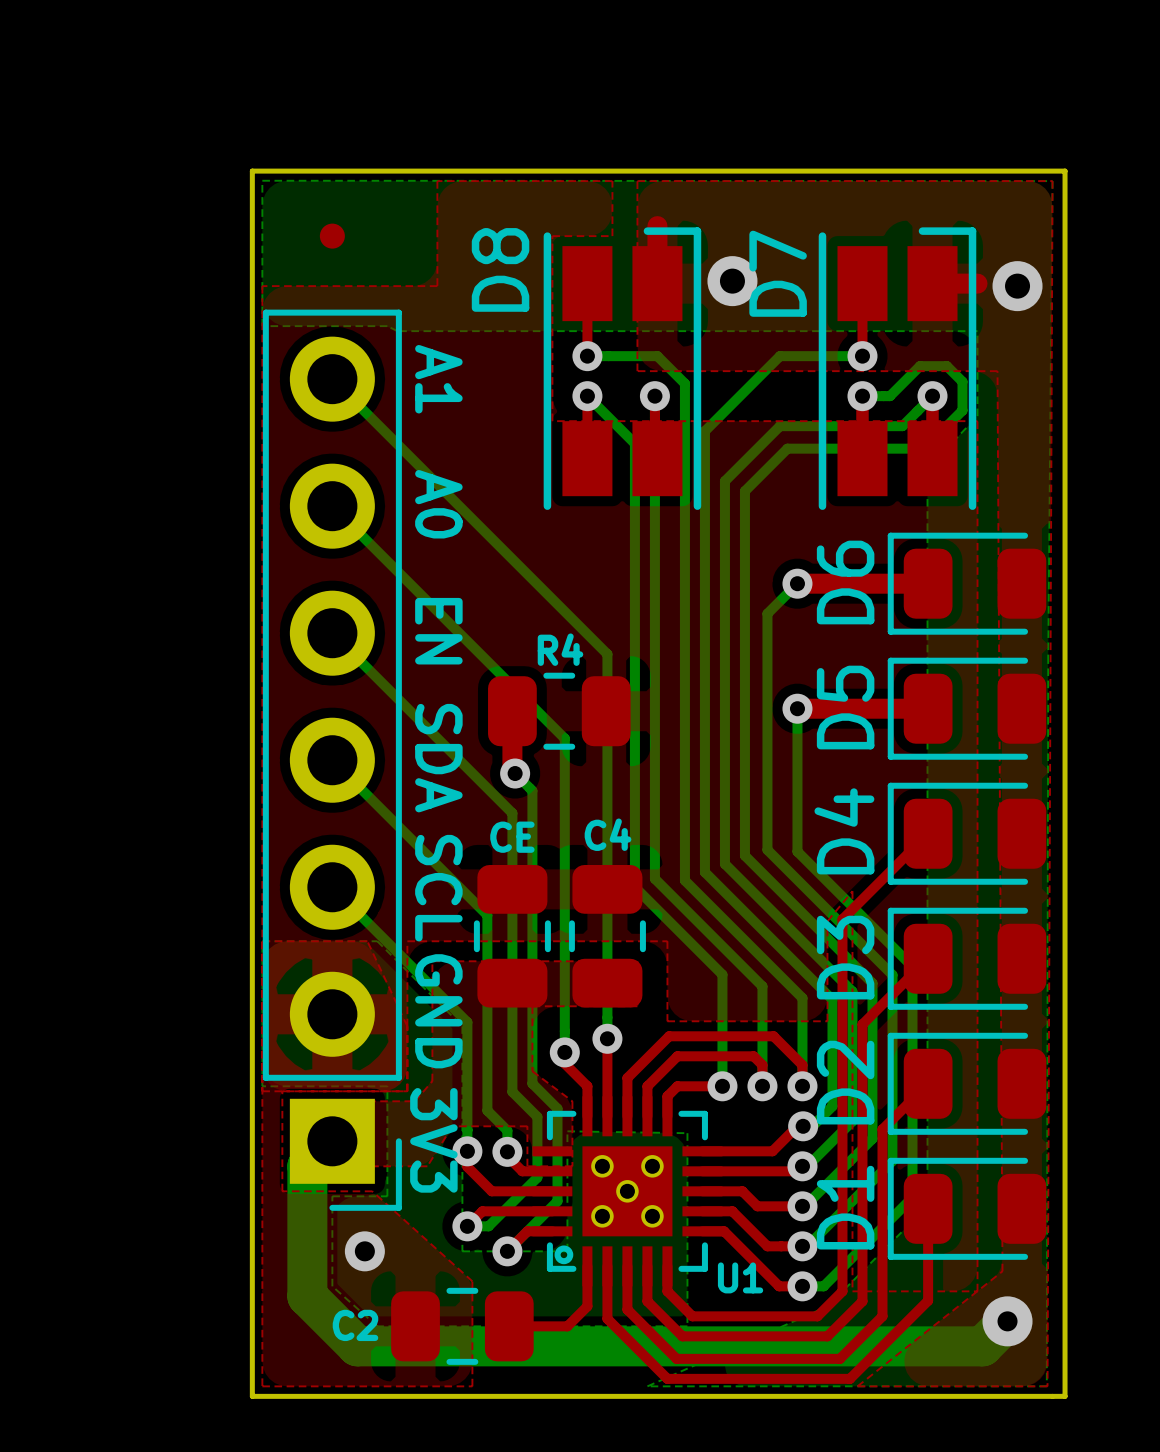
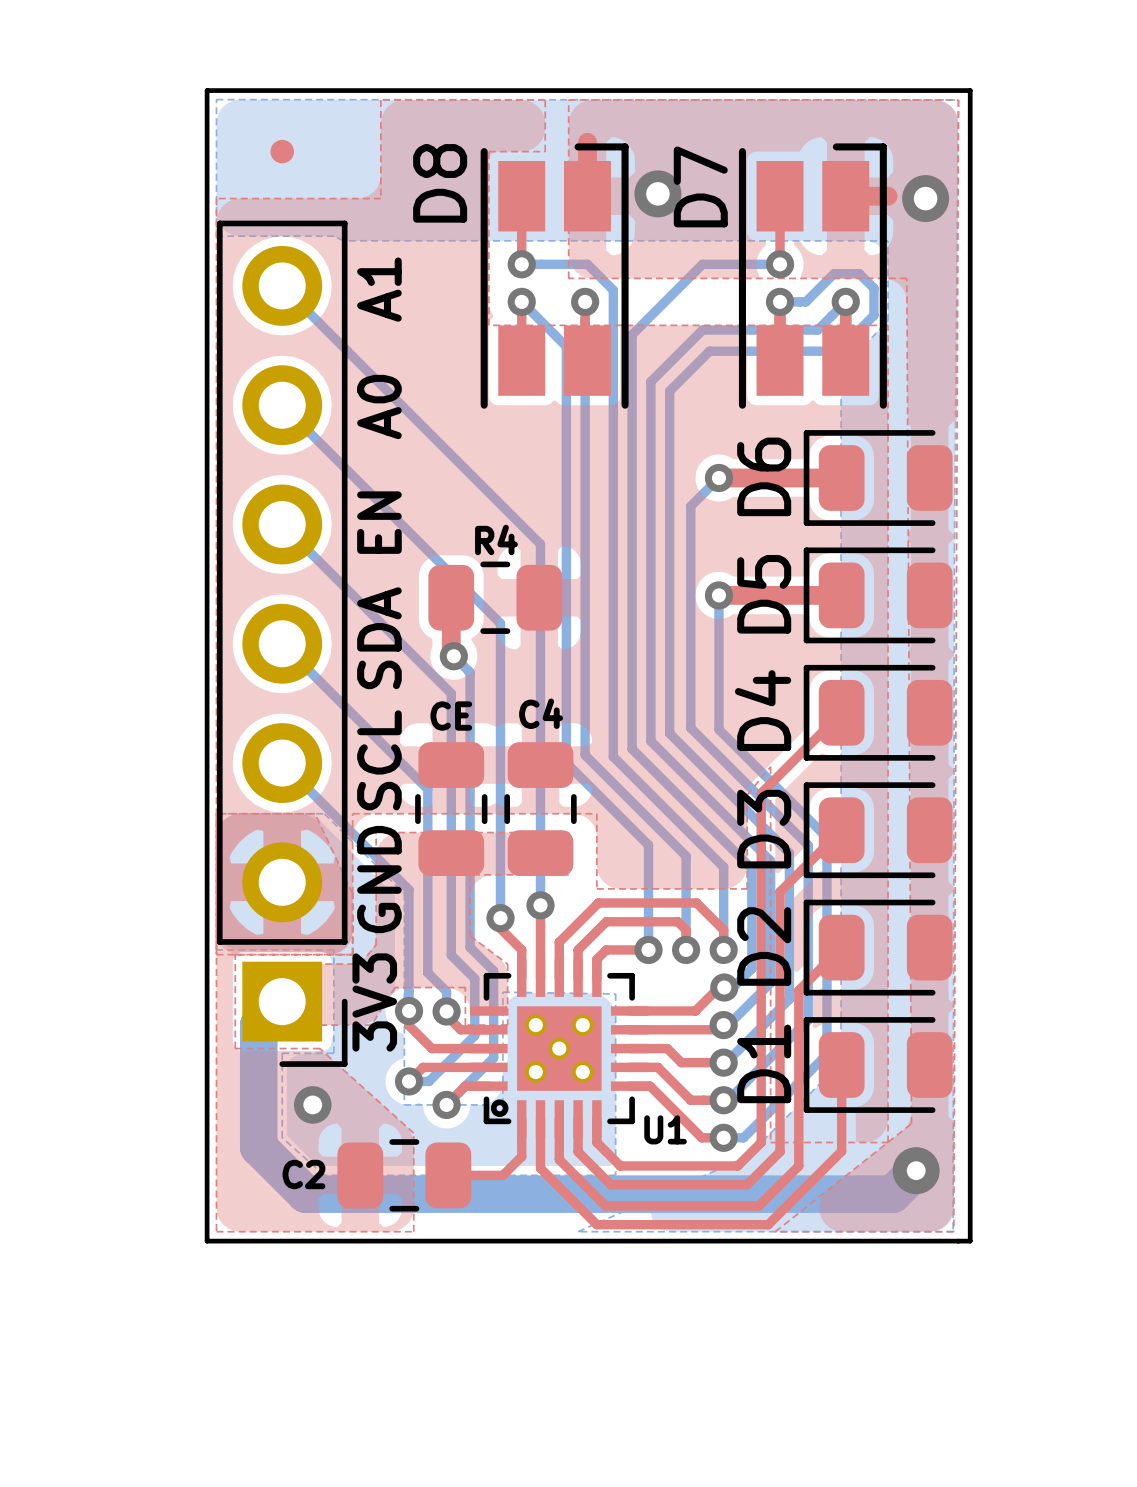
text rotation: 0° (438, 379) -> 180° (379, 289)
text rotation: 0° (438, 504) -> 180° (379, 406)
text rotation: 0° (438, 631) -> 180° (379, 522)
text rotation: 0° (438, 758) -> 180° (379, 638)
text rotation: 0° (438, 888) -> 180° (379, 760)
text rotation: 0° (438, 1011) -> 180° (379, 879)
text rotation: 0° (433, 1140) -> 180° (374, 1002)

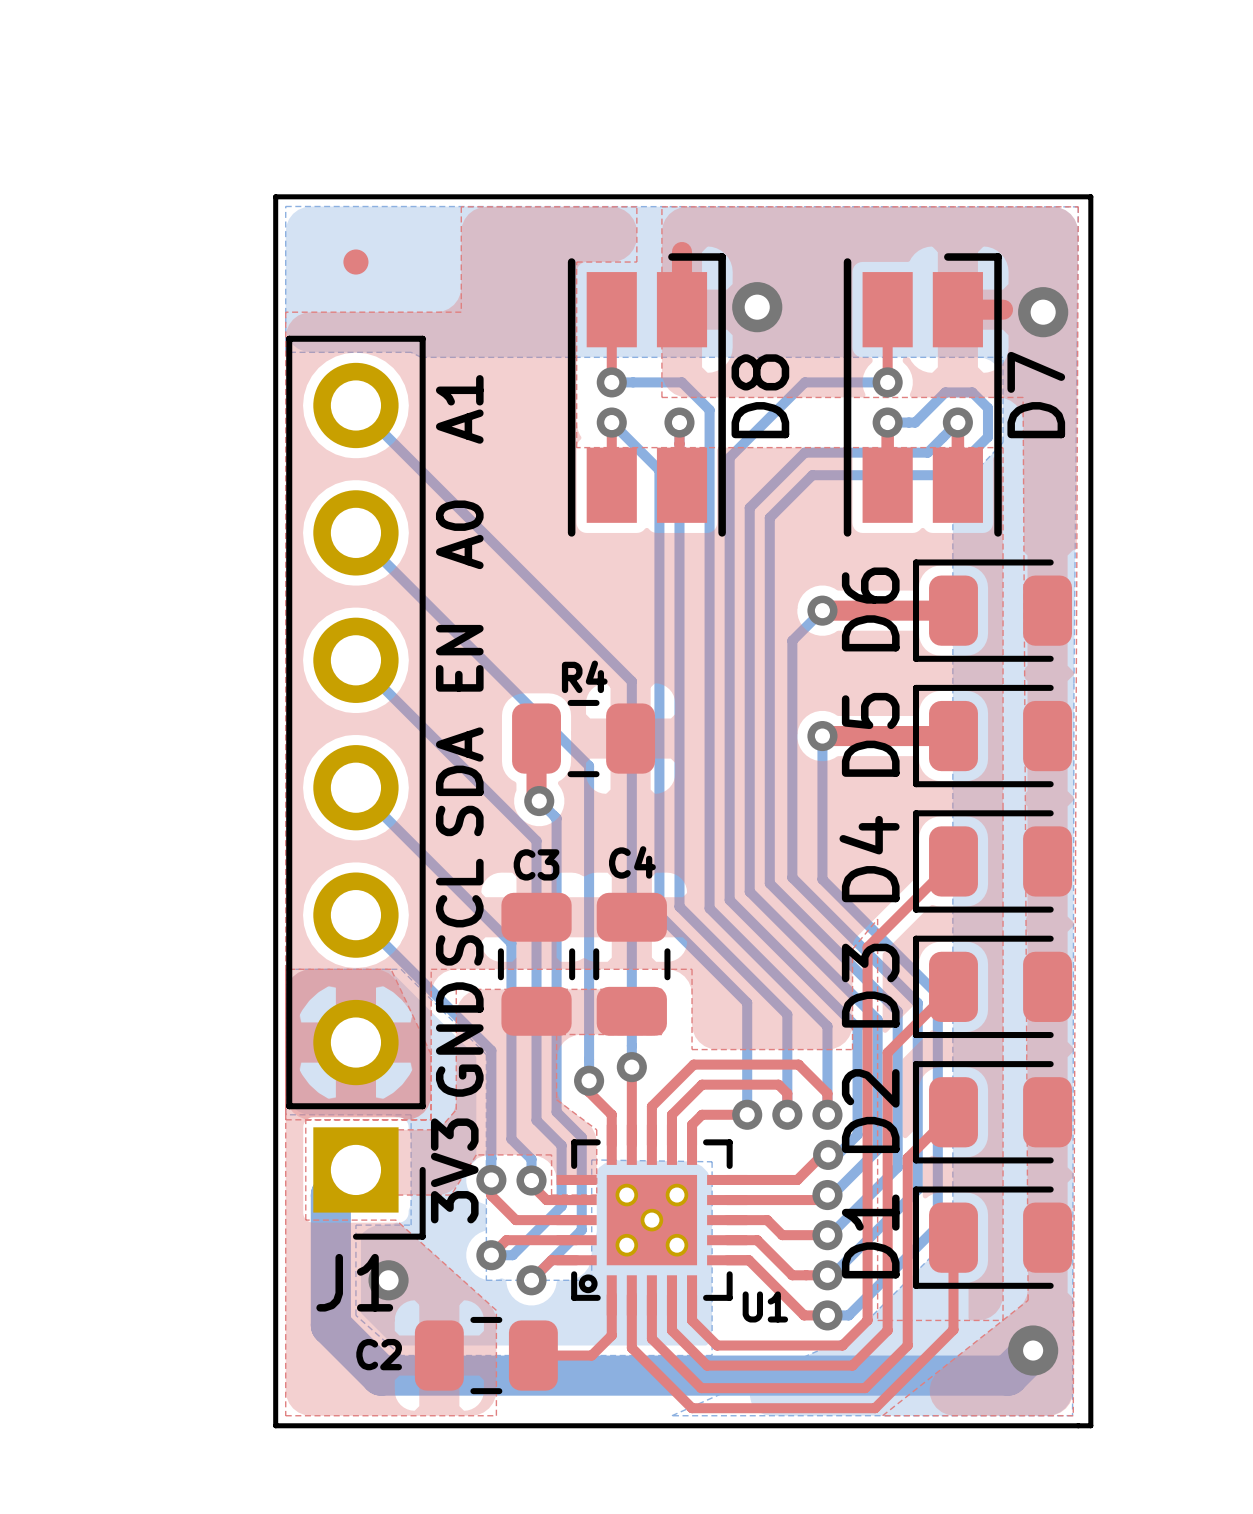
D8 name position: D8 (440, 183) -> D8 (760, 396)
D7 name position: D7 (700, 186) -> D7 (1036, 395)
CE name: CE (451, 716) -> C3 (536, 864)
J1 name: none -> J1 (354, 1282)

